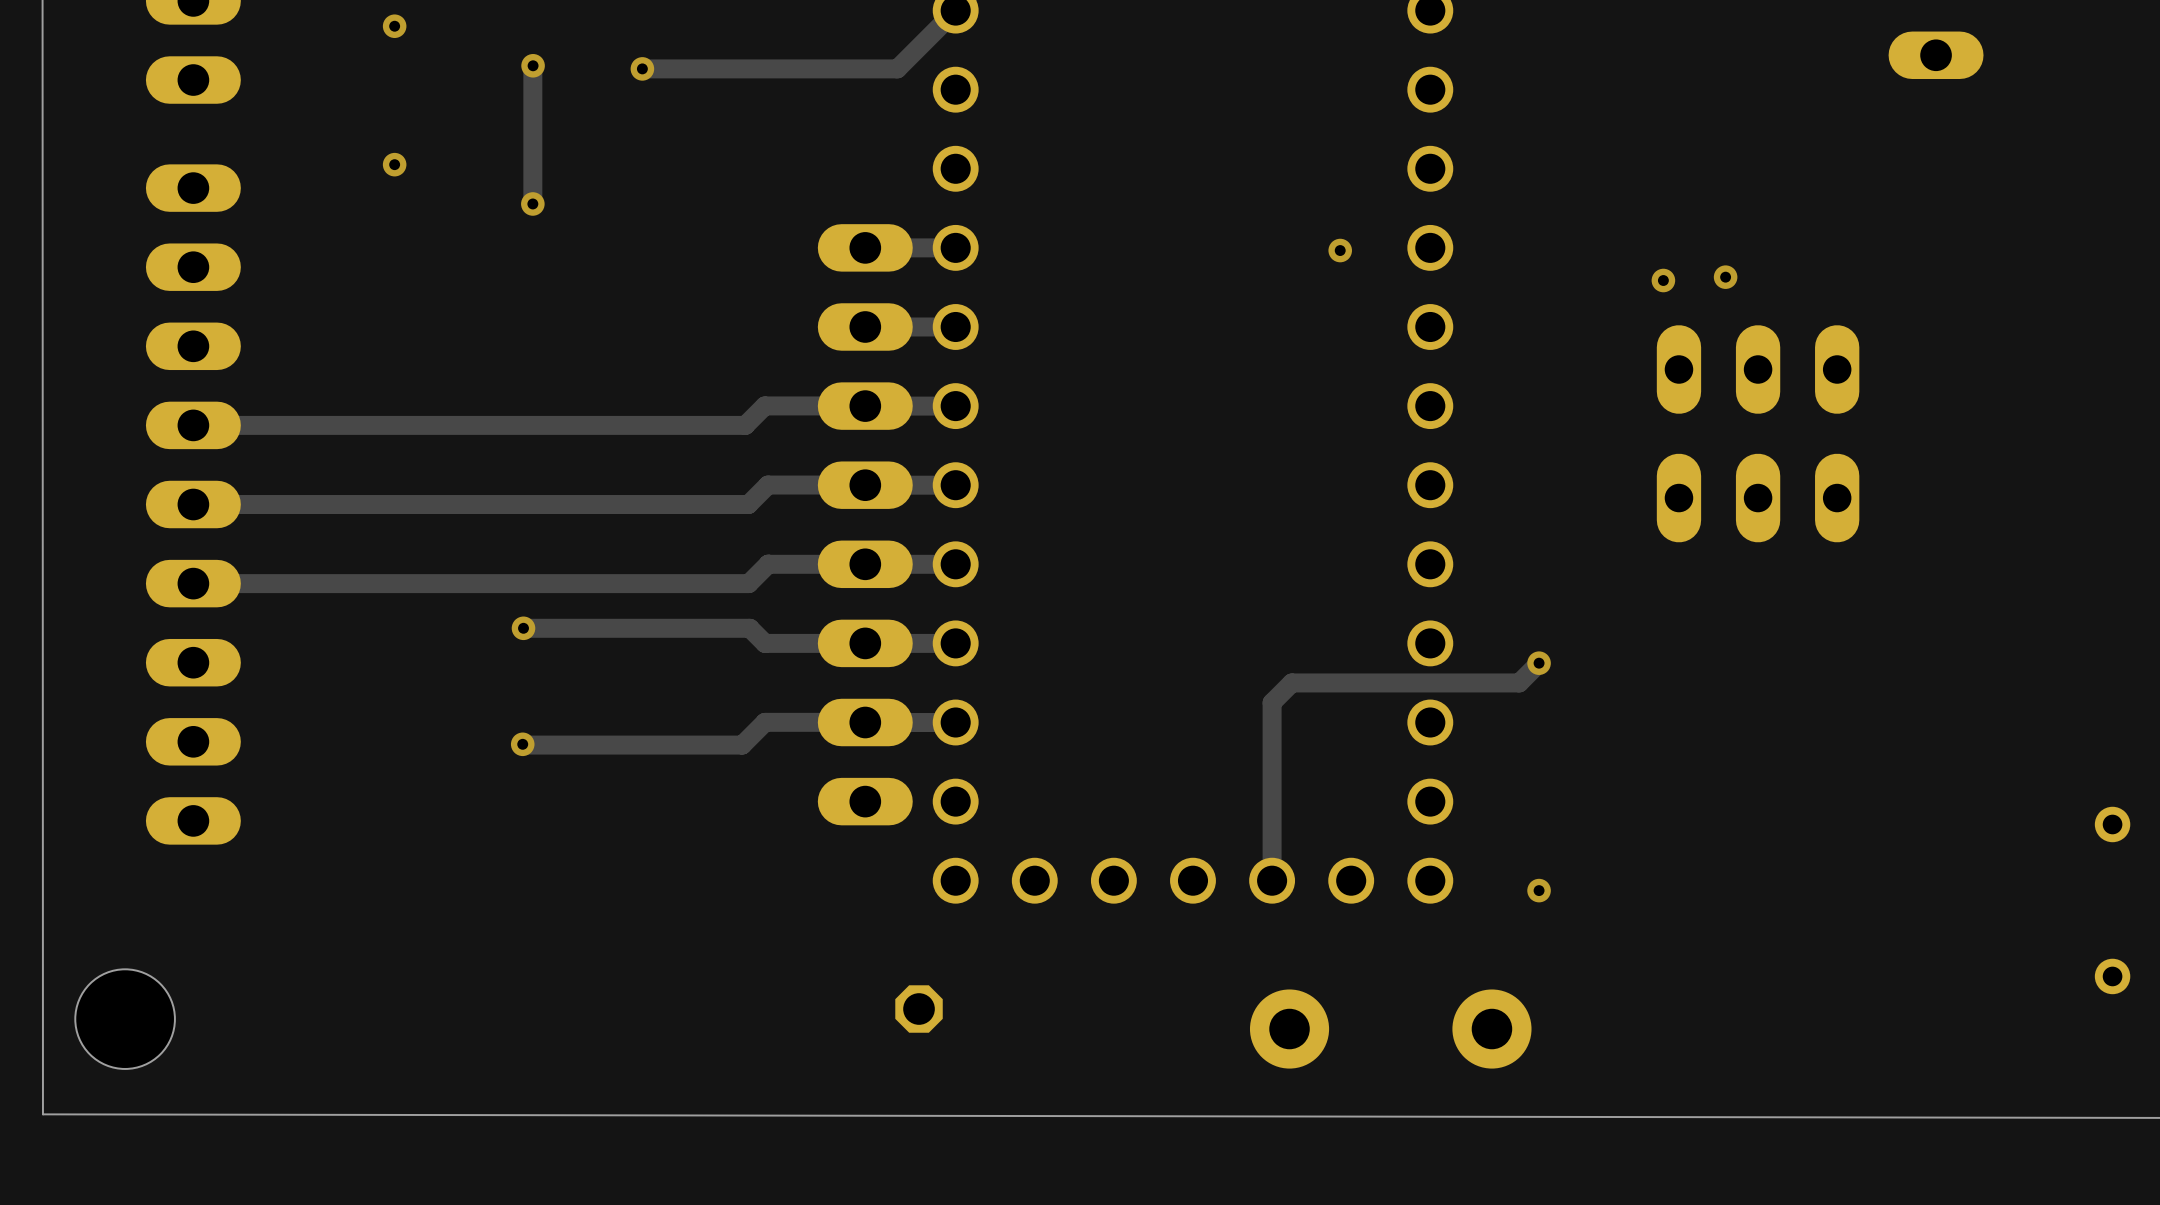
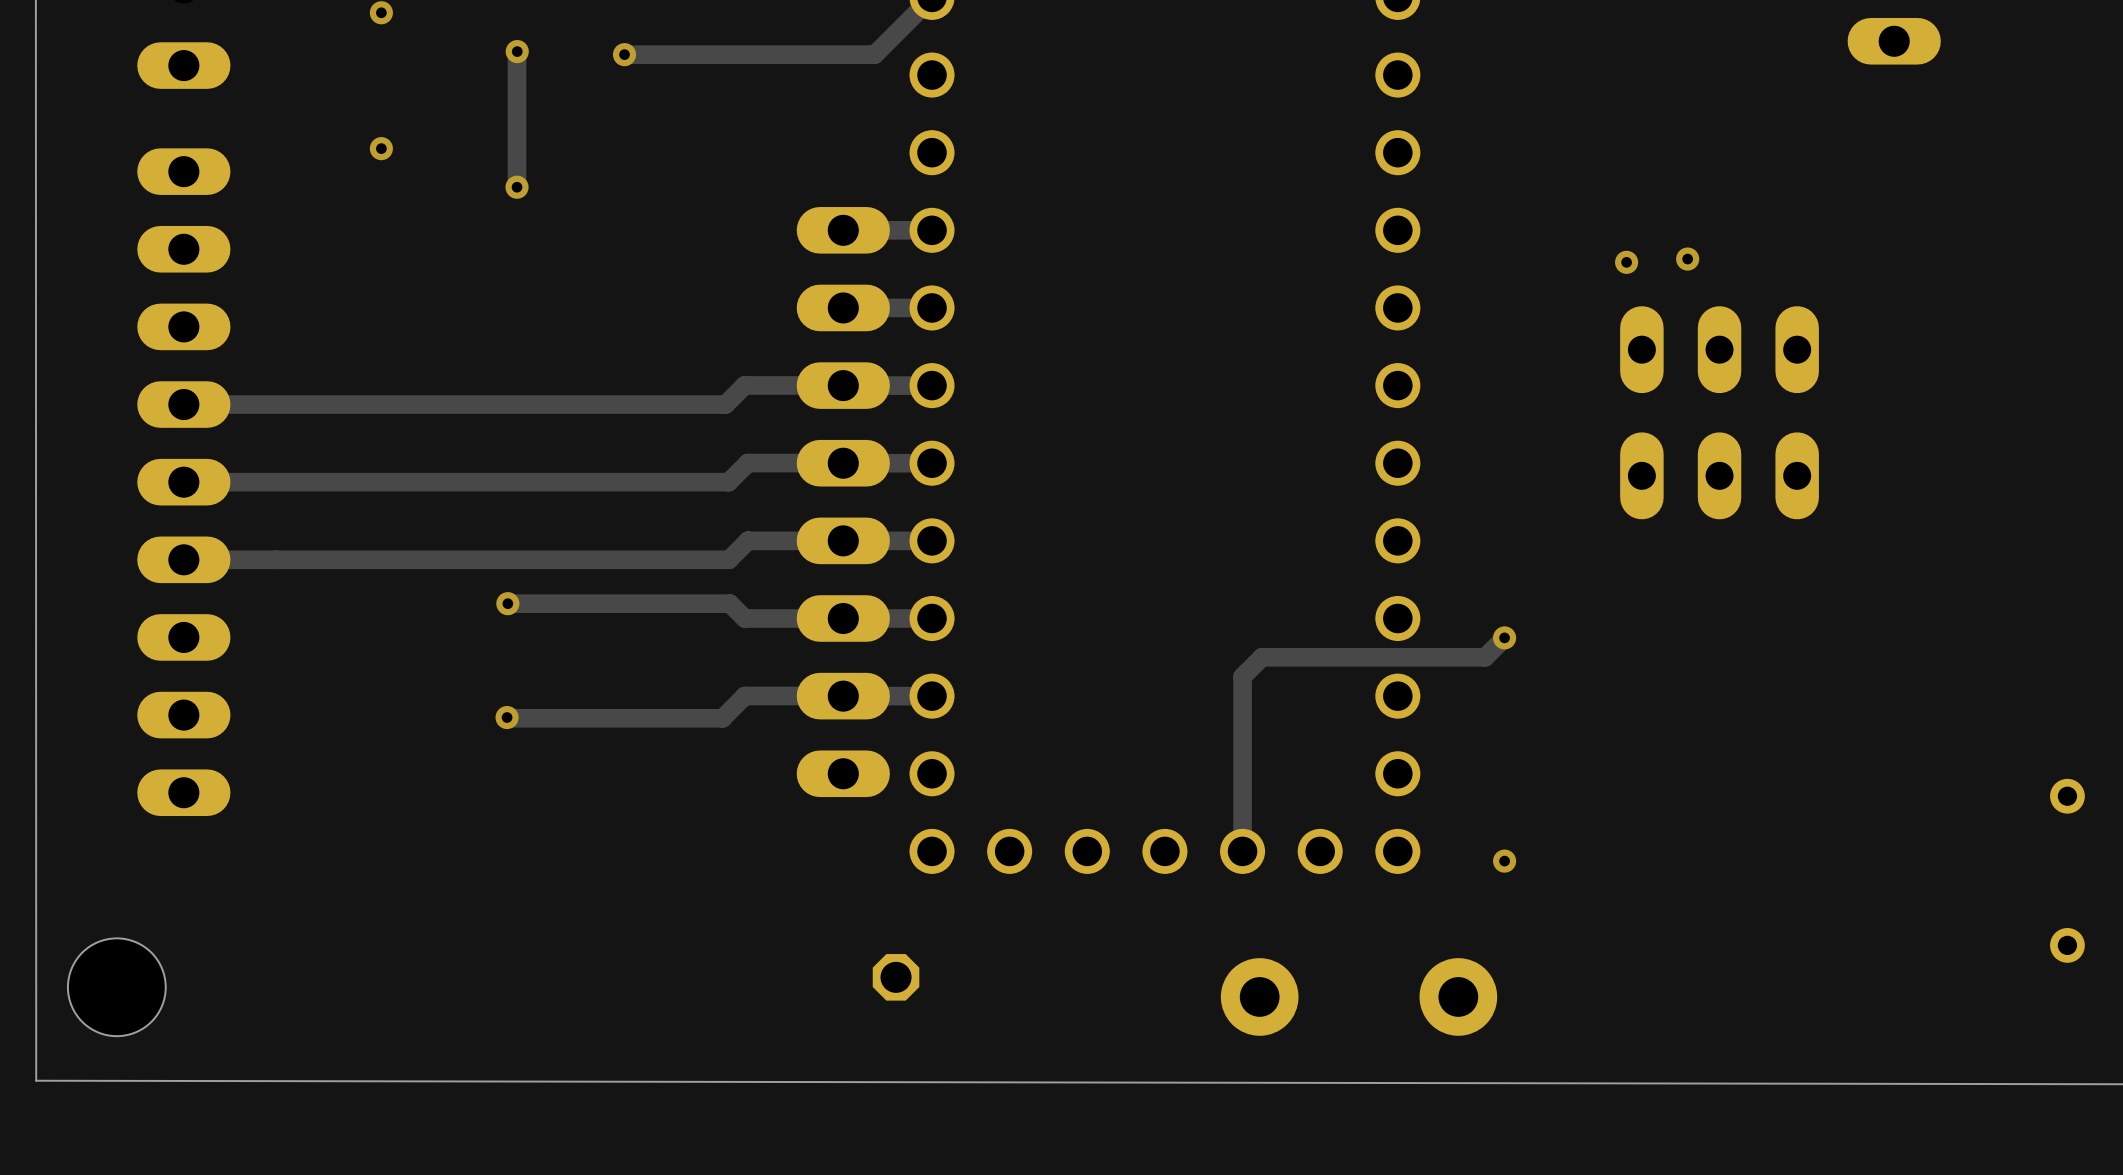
via: (1340, 250) -> none

